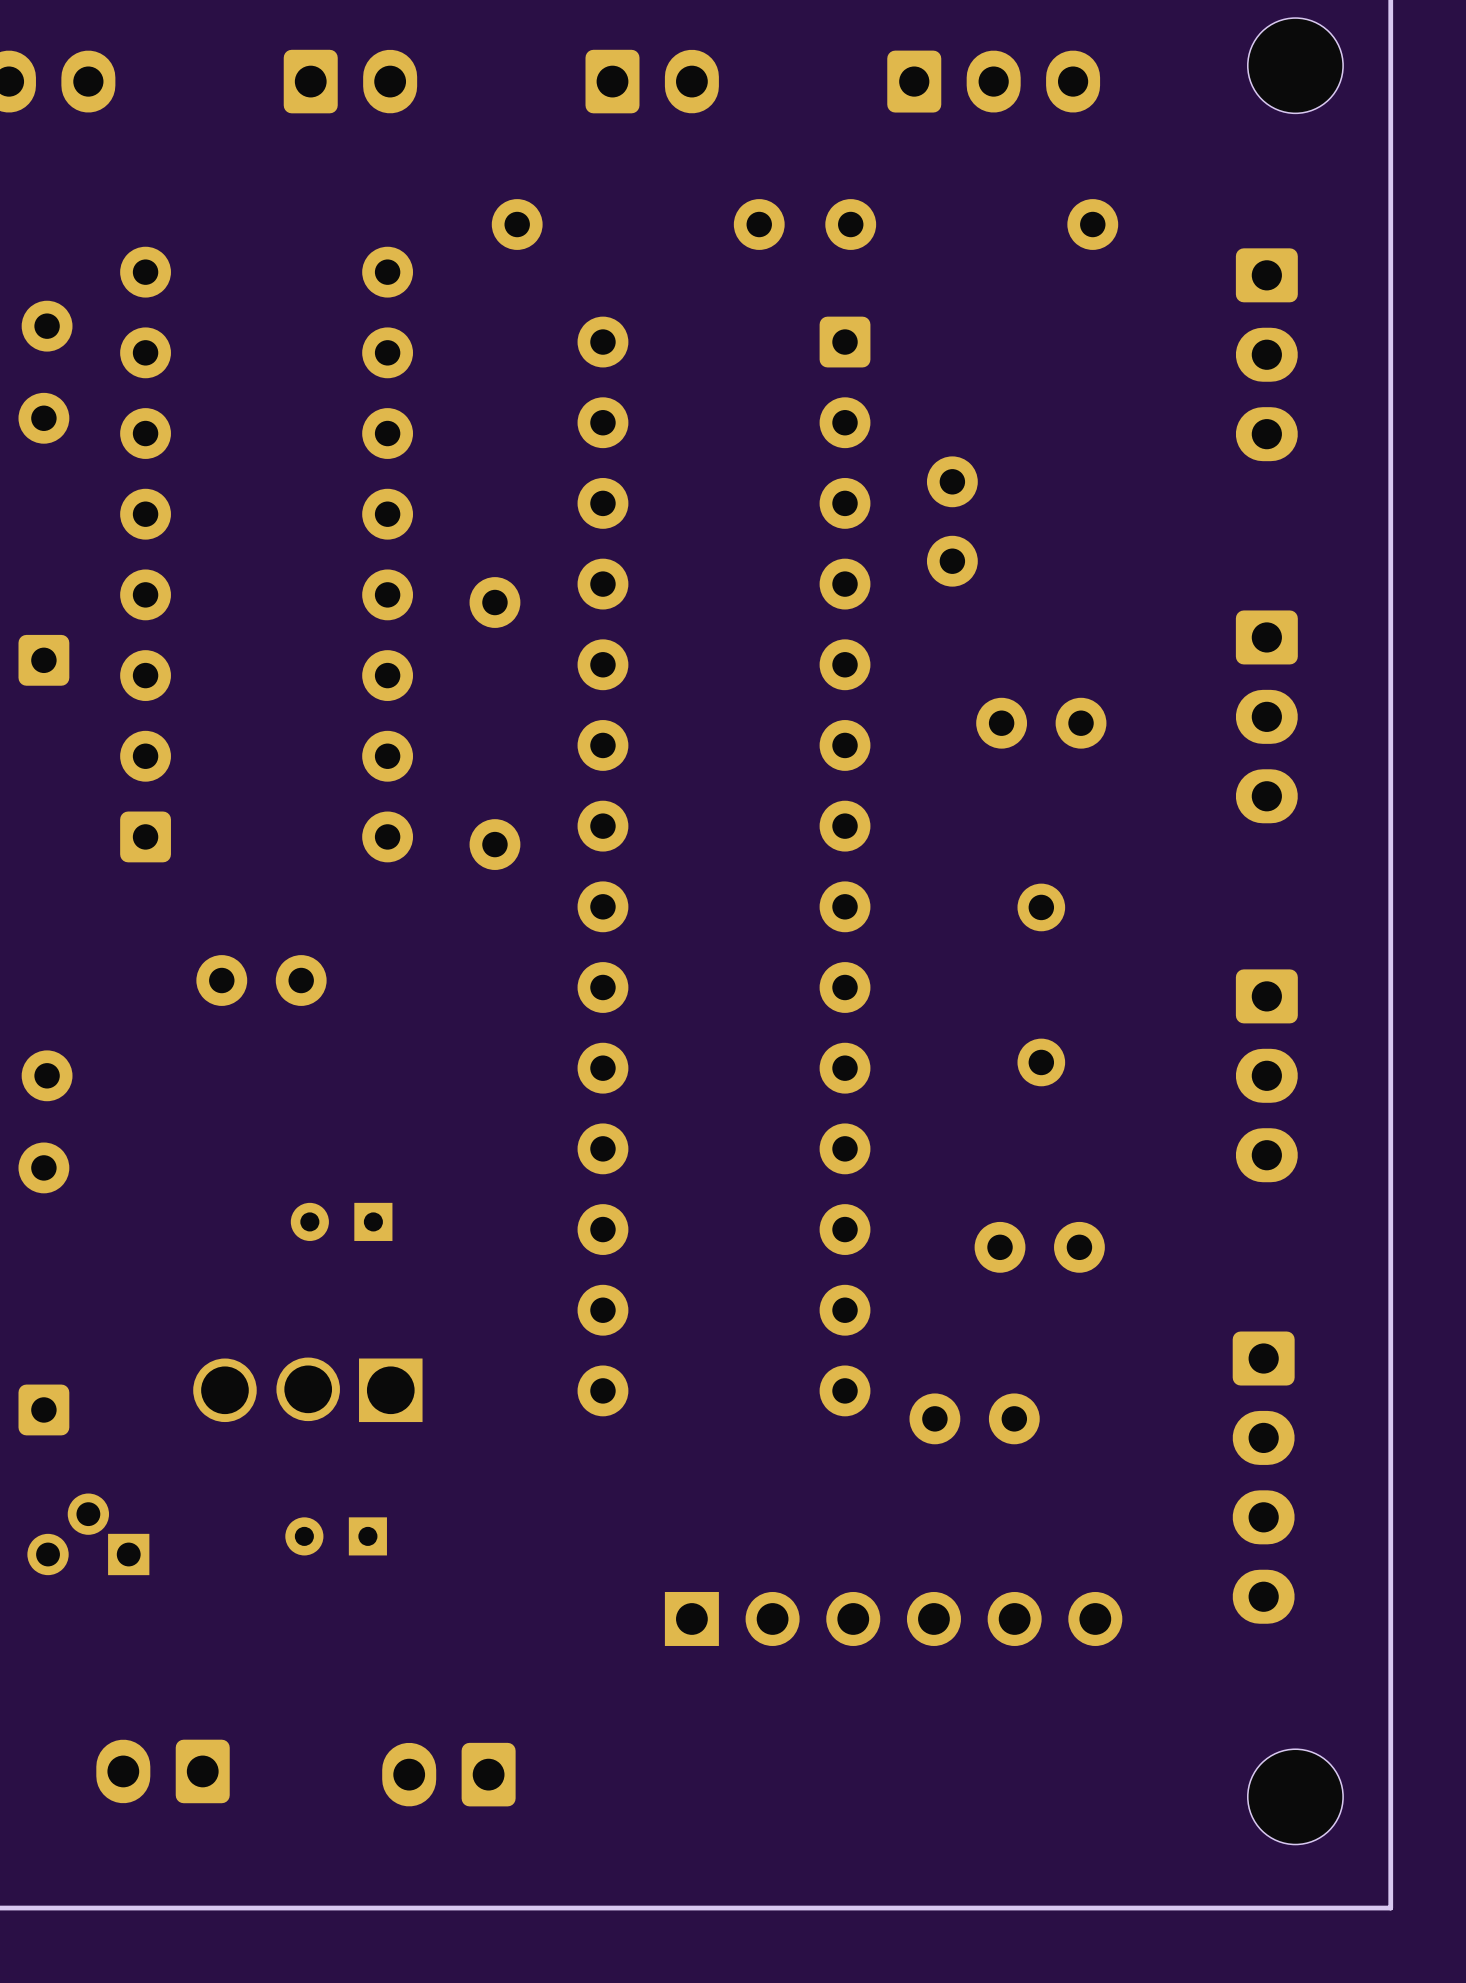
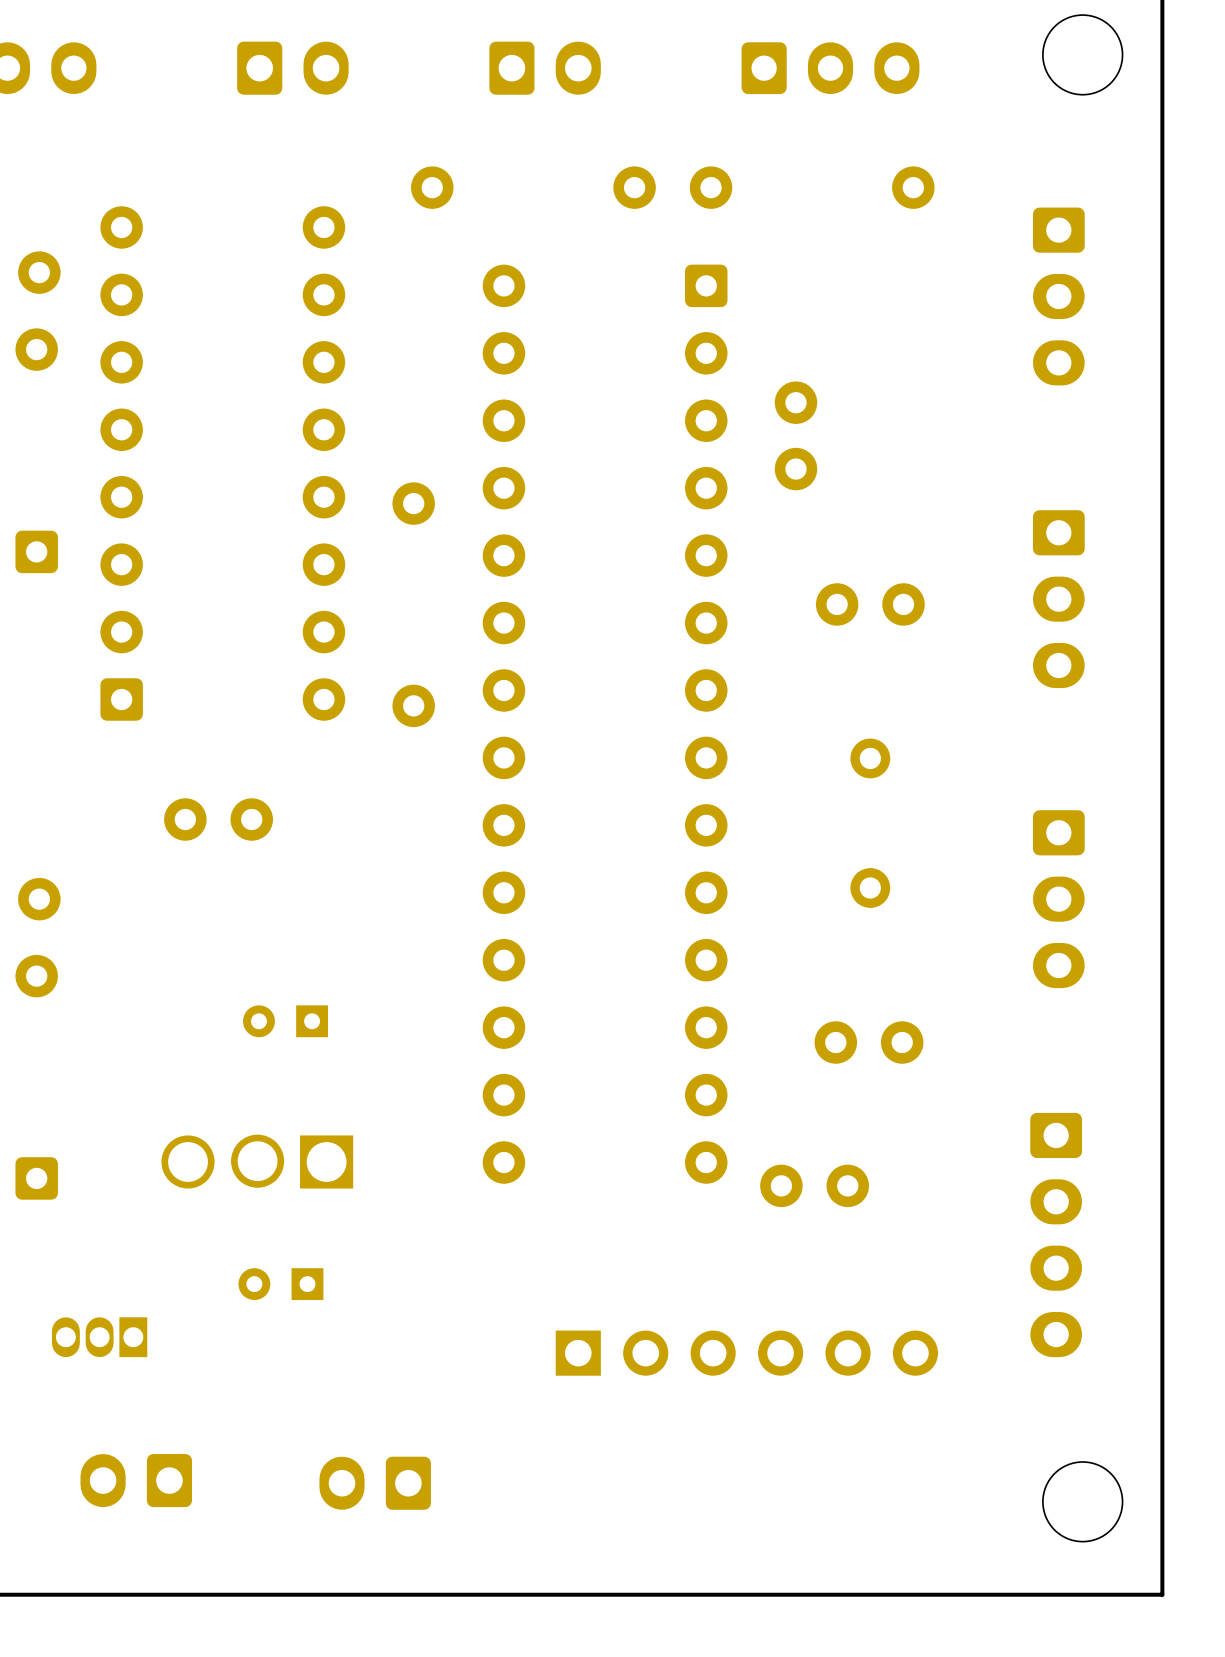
part: (88, 1534) -> none
part: none -> (99, 1337)

